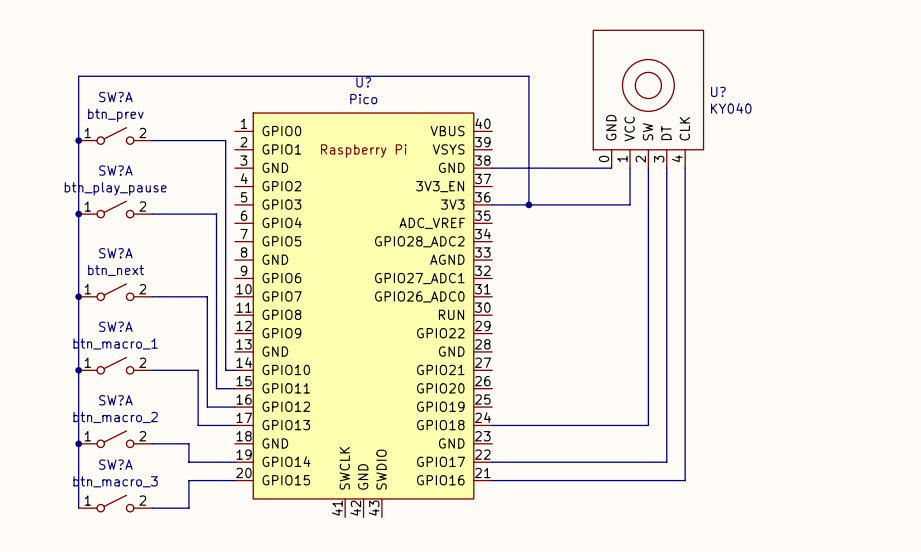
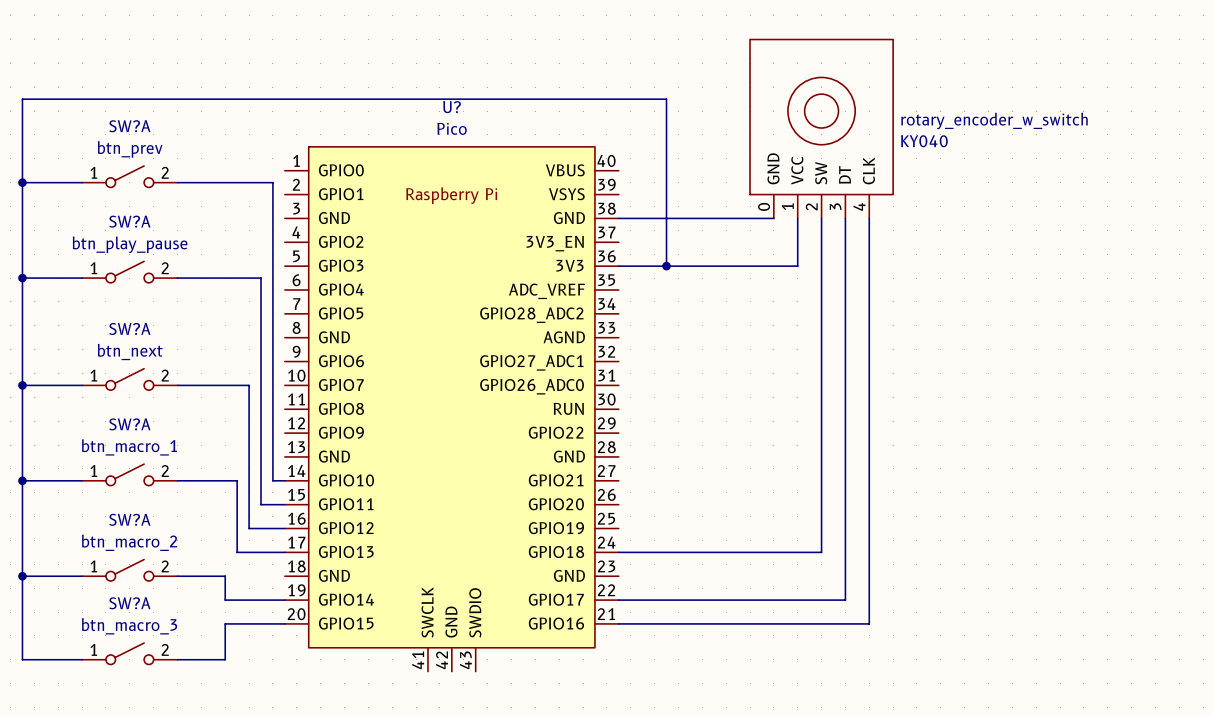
wire: (78, 76) (78, 508) -> (82, 99) (22, 99) (22, 659) (82, 659)
U? name: U? (718, 91) -> rotary_encoder_w_switch (994, 120)
wire: none -> (22, 182) (82, 182)
junction: none -> (22, 182)
junction: (78, 140) -> none
wire: none -> (22, 278) (82, 278)
junction: none -> (22, 278)
junction: (78, 214) -> none
wire: none -> (22, 385) (82, 385)
junction: none -> (22, 385)
junction: (78, 296) -> none
wire: none -> (22, 480) (82, 480)
junction: none -> (22, 480)
junction: (78, 370) -> none
wire: none -> (22, 576) (82, 576)
junction: none -> (22, 576)
junction: (78, 443) -> none

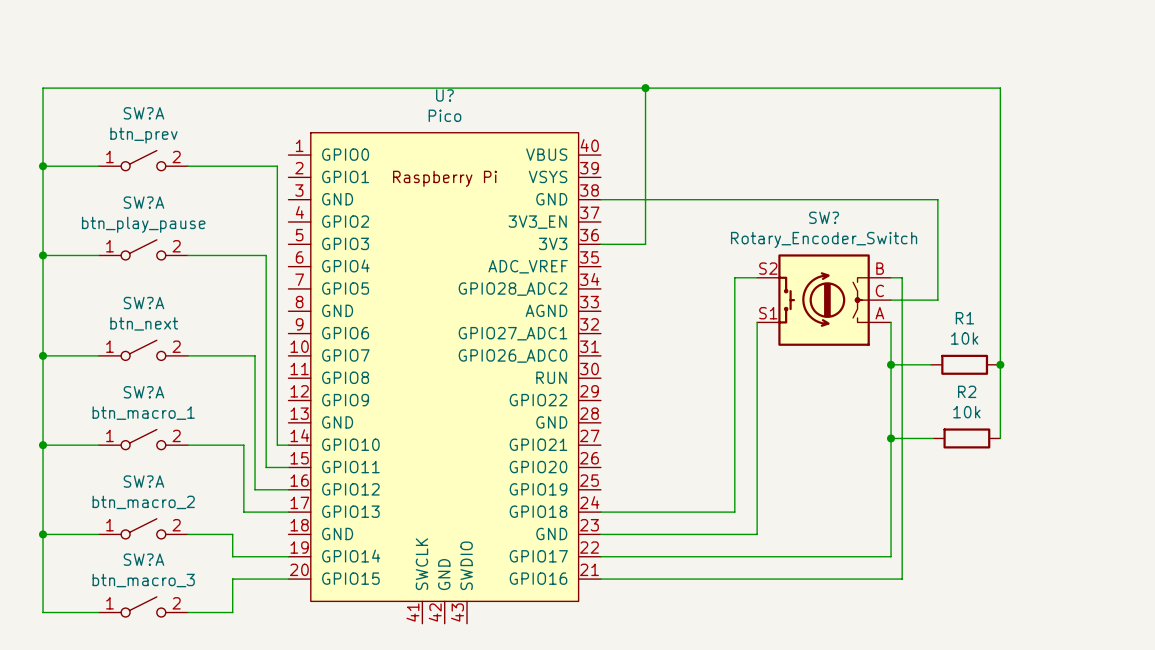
wire: none -> (645, 88) (1000, 88) (1000, 438)
junction: none -> (645, 88)
rotary_encoder_w_switch: KY040 (821, 128) -> none
wire: none -> (745, 199) (937, 199) (937, 300) (891, 300)
wire: (797, 218) (797, 266) (666, 266) -> none
wire: (821, 218) (821, 552) (761, 552) -> (757, 277) (734, 277) (734, 512)
wire: (845, 218) (845, 600) -> (891, 322) (891, 556) (812, 556)
wire: (869, 218) (869, 623) -> (891, 277) (902, 277) (902, 579) (835, 579)
junction: (666, 266) -> none
SW?: none -> Rotary_Encoder_Switch (824, 300)
wire: none -> (757, 322) (757, 534) (600, 534)
wire: none -> (891, 364) (931, 364)
junction: none -> (891, 364)
R1: none -> 10k (964, 364)
junction: none -> (1000, 364)
wire: none -> (891, 438) (933, 438)
junction: none -> (891, 438)
R2: none -> 10k (966, 438)

